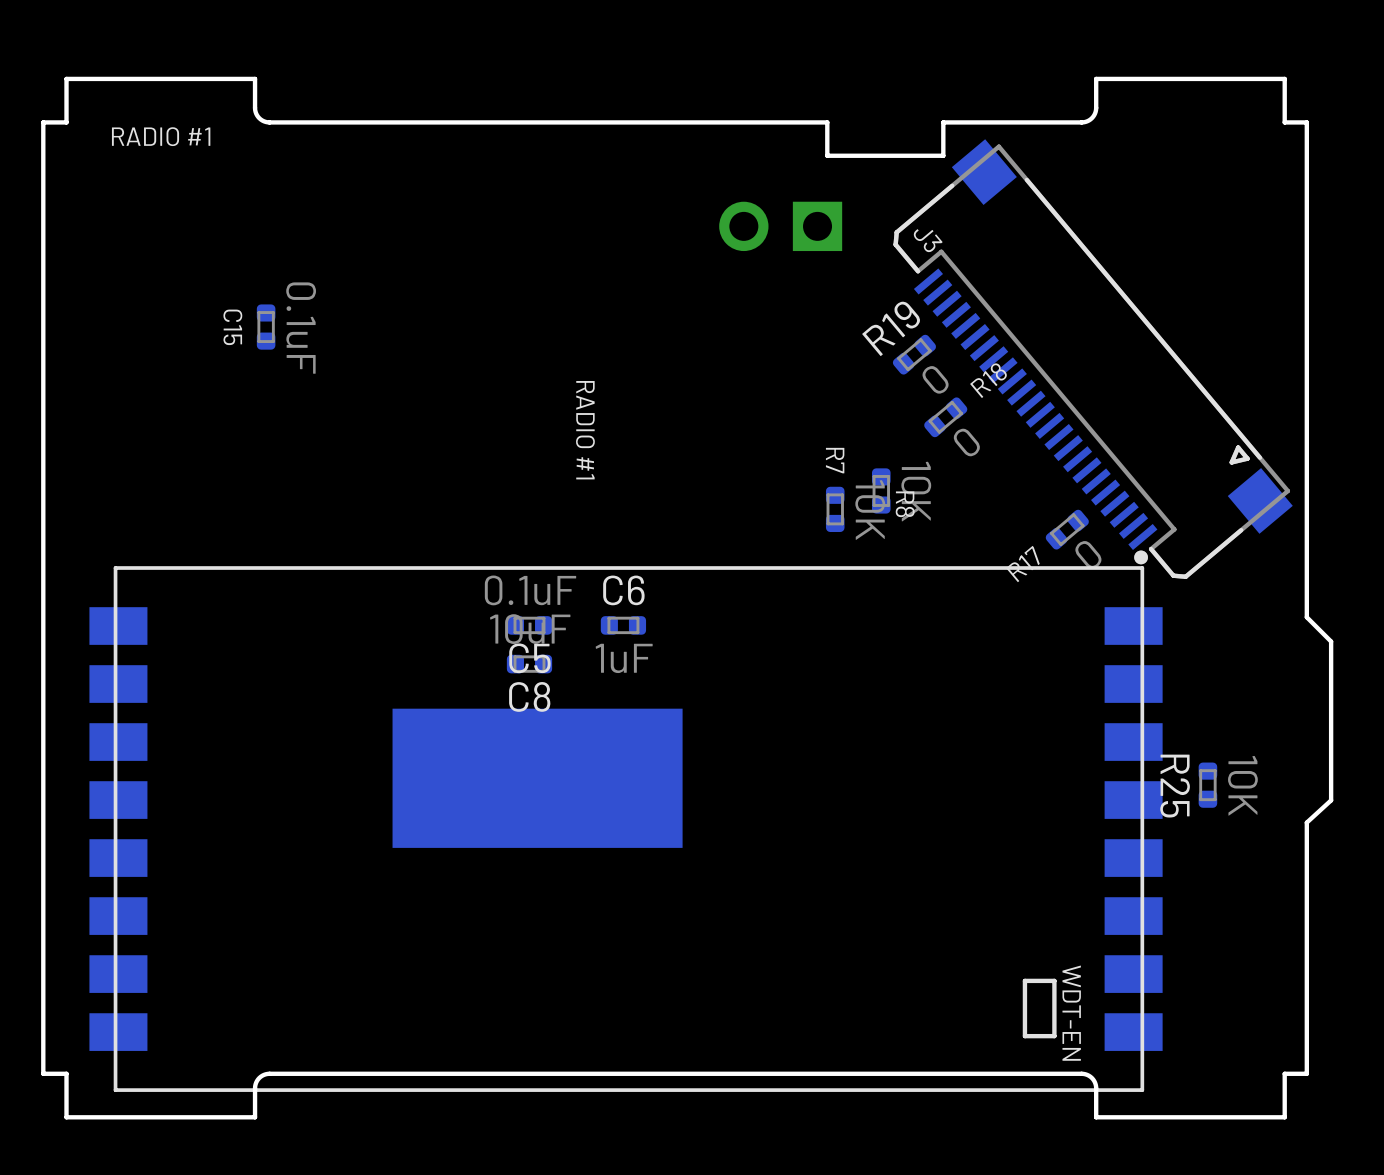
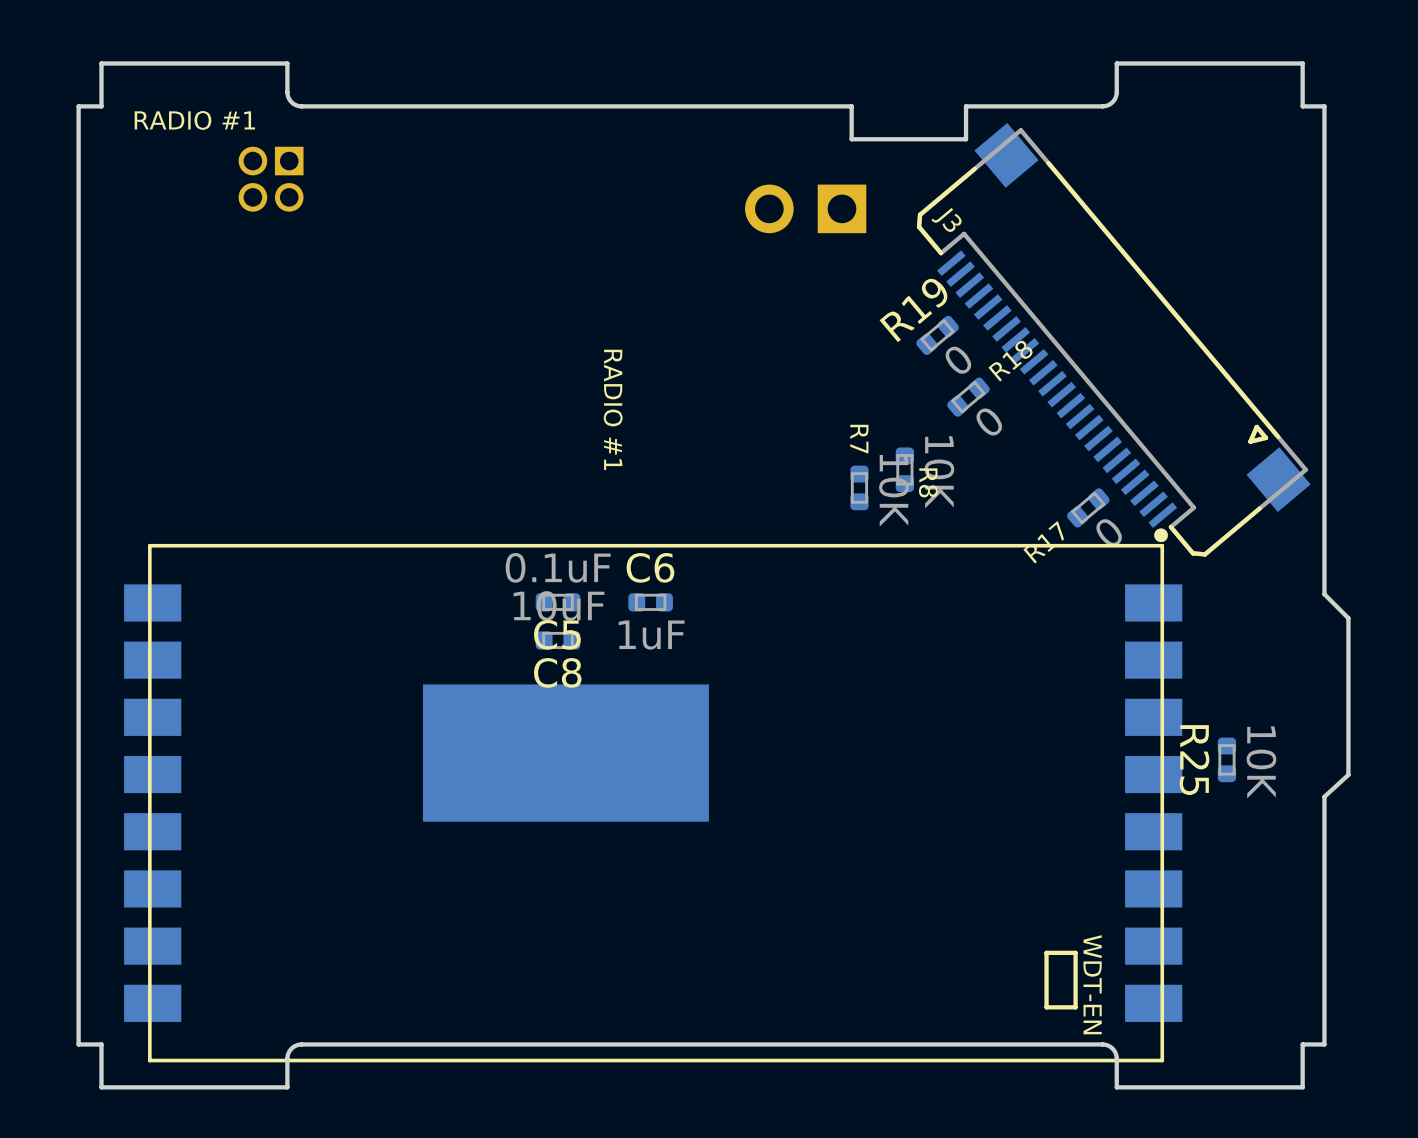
part: none -> (271, 179)
C15: 0.1uF (266, 327) -> none

